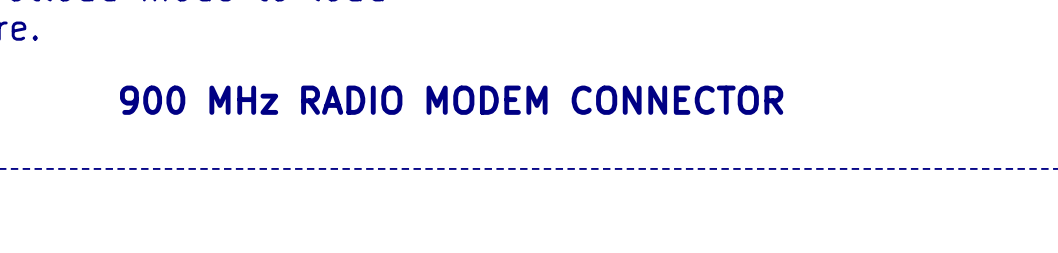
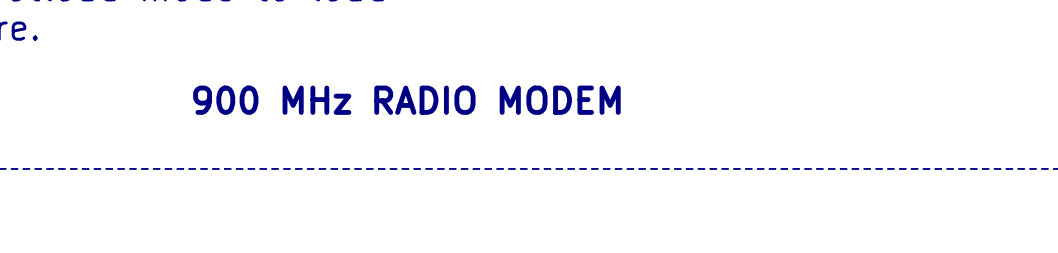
text: 900 MHz RADIO MODEM CONNECTOR (451, 100) -> 900 MHz RADIO MODEM (406, 100)

